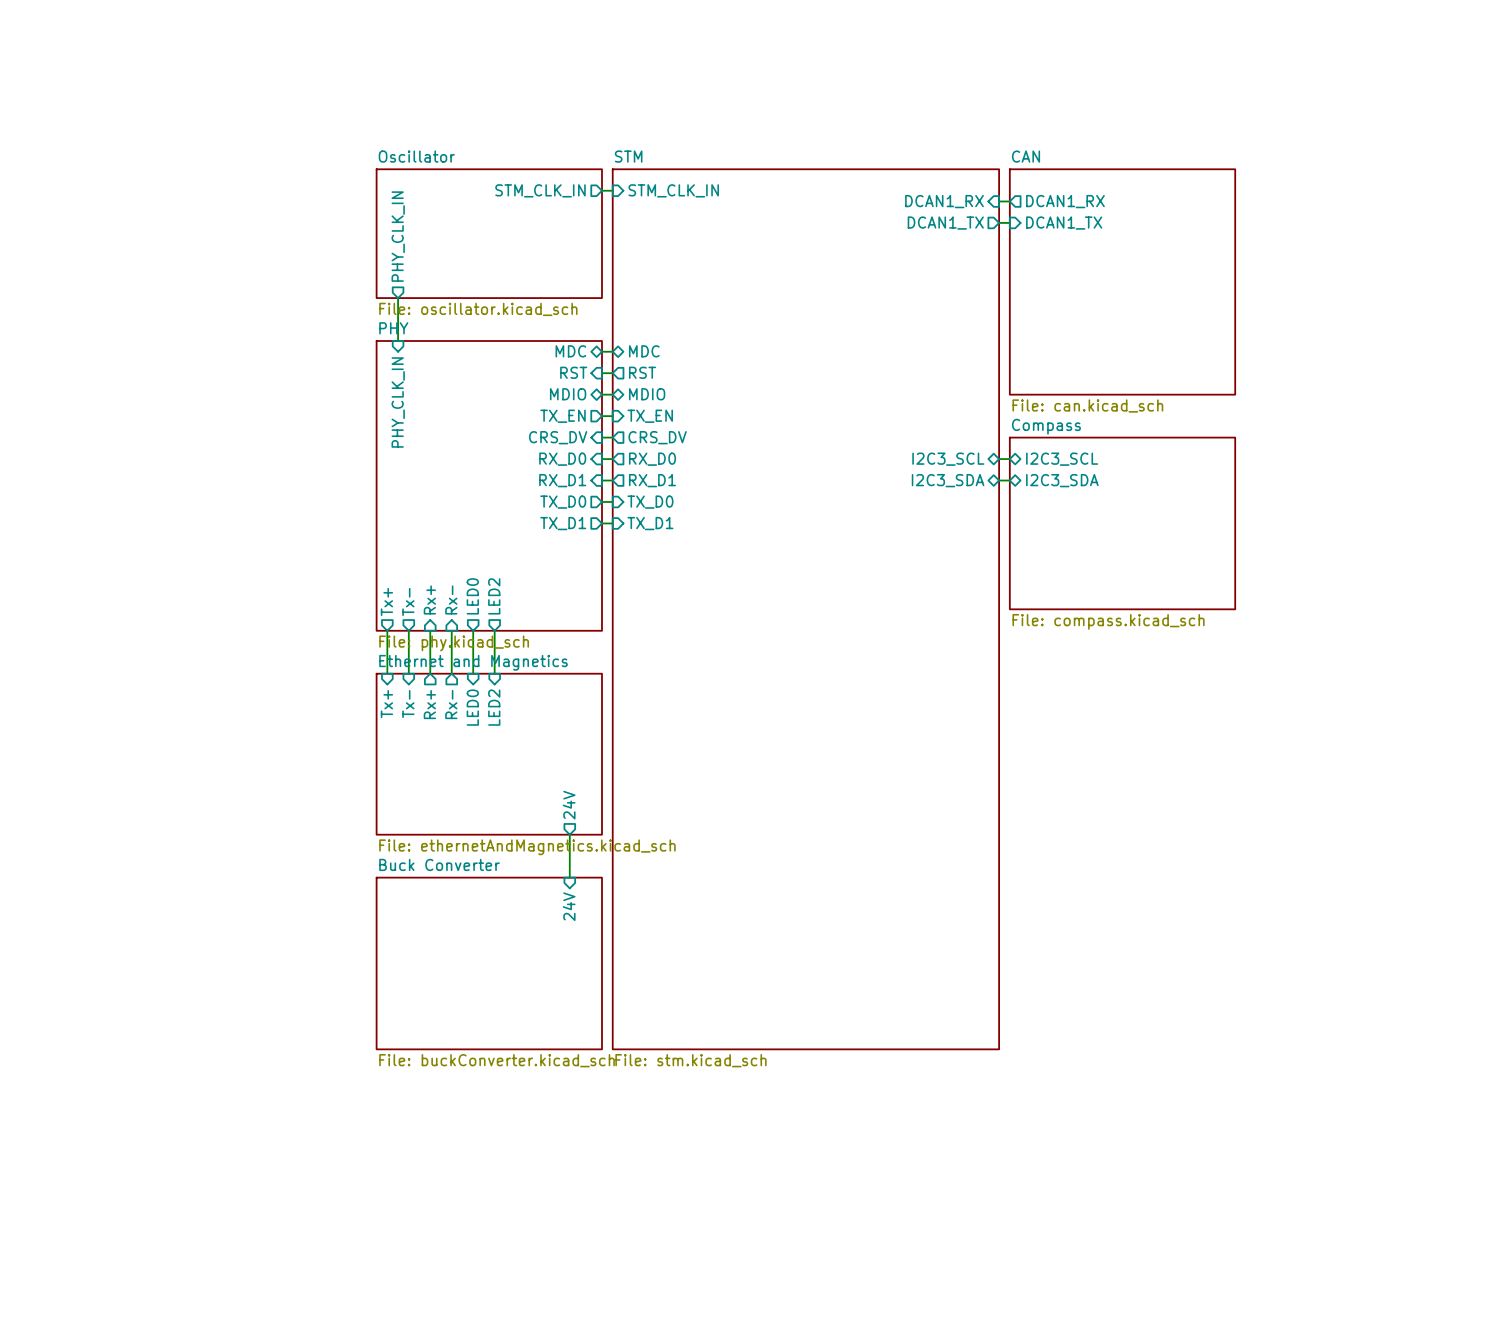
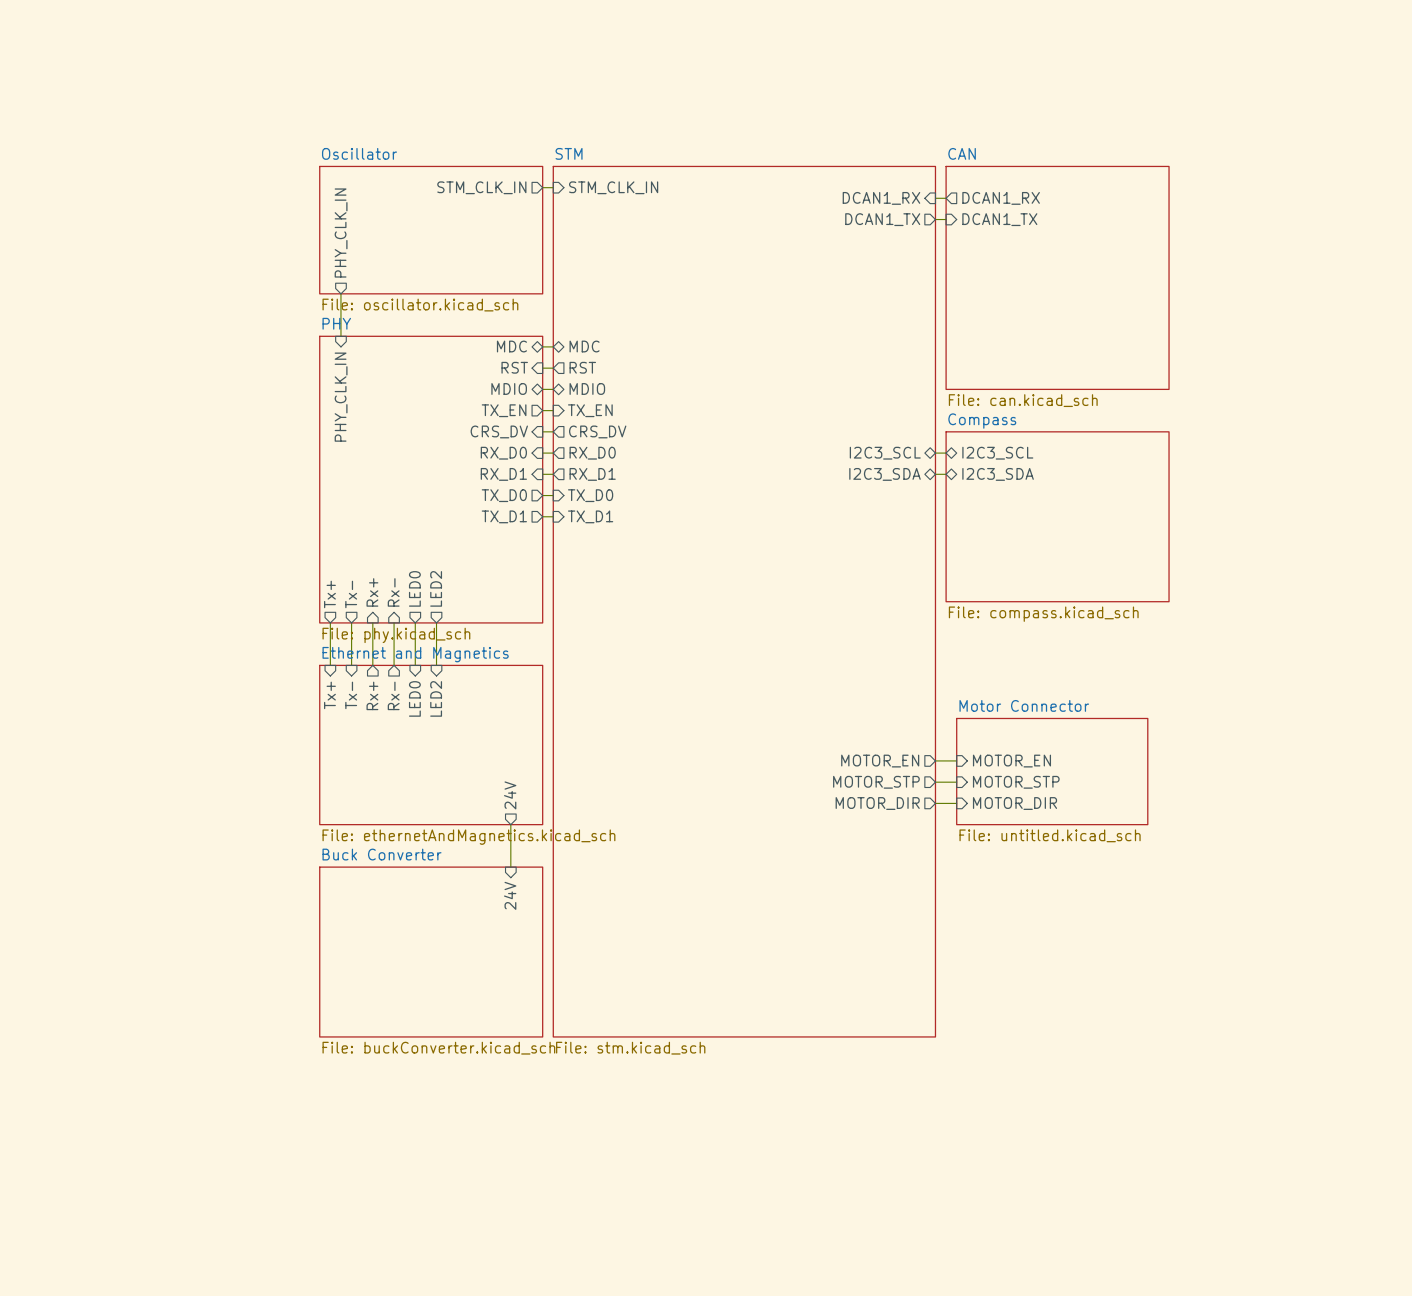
sheet pin: none -> MOTOR_EN (880, 761)
wire: none -> (935, 760) (956, 760)
sheet pin: none -> MOTOR_EN (1011, 761)
sheet Motor Connector: none -> File: untitled.kicad_sch (1052, 771)
sheet pin: none -> MOTOR_STP (876, 782)
wire: none -> (935, 782) (956, 782)
sheet pin: none -> MOTOR_STP (1016, 782)
sheet pin: none -> MOTOR_DIR (877, 803)
wire: none -> (935, 803) (956, 803)
sheet pin: none -> MOTOR_DIR (1015, 803)

